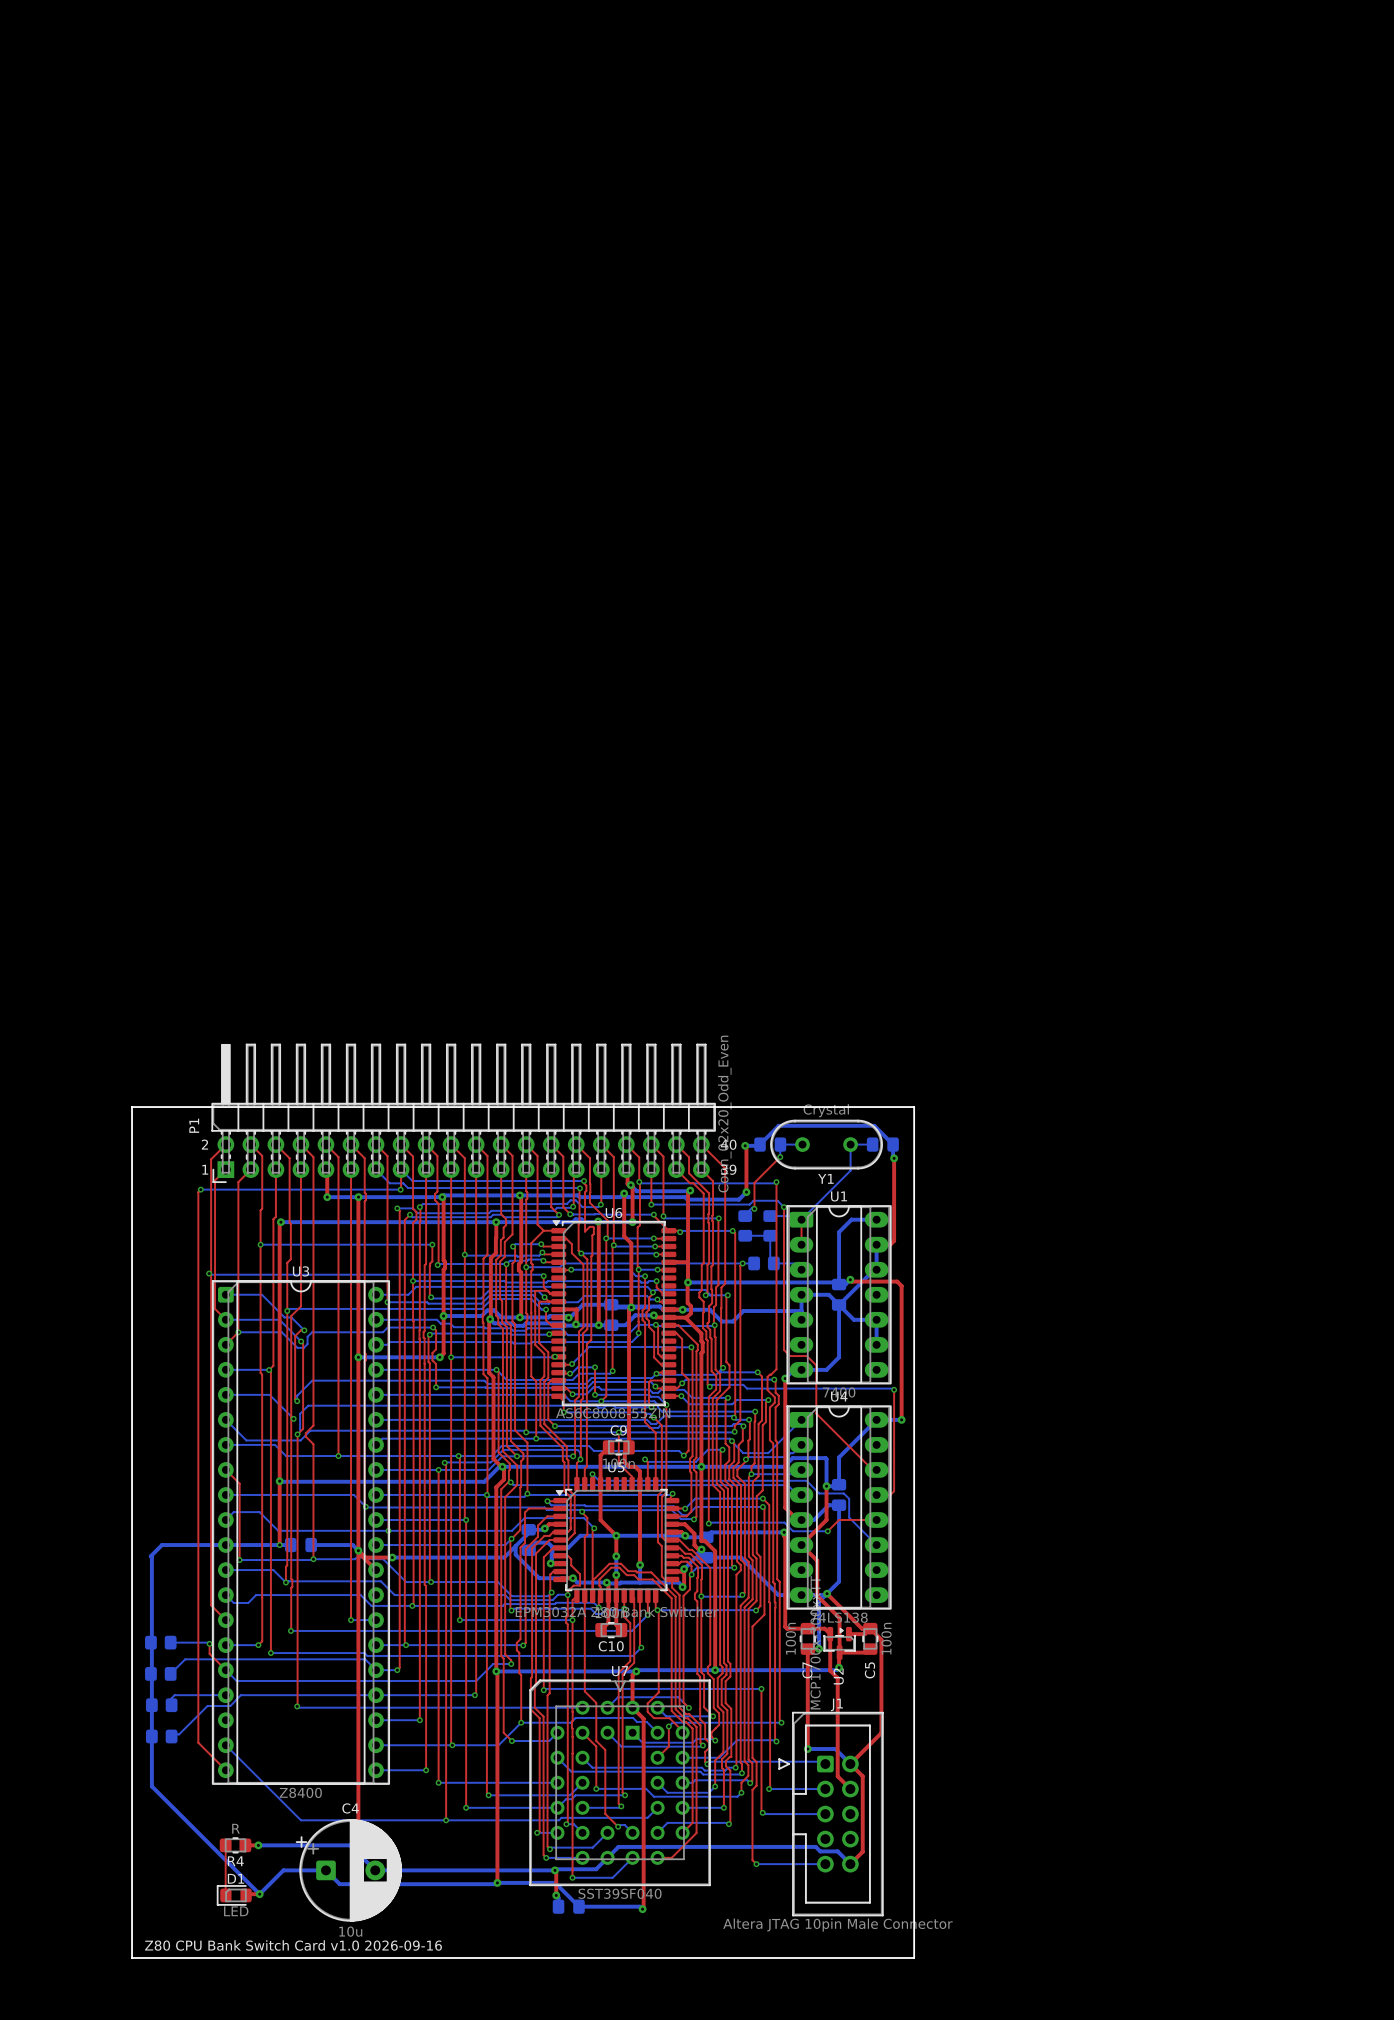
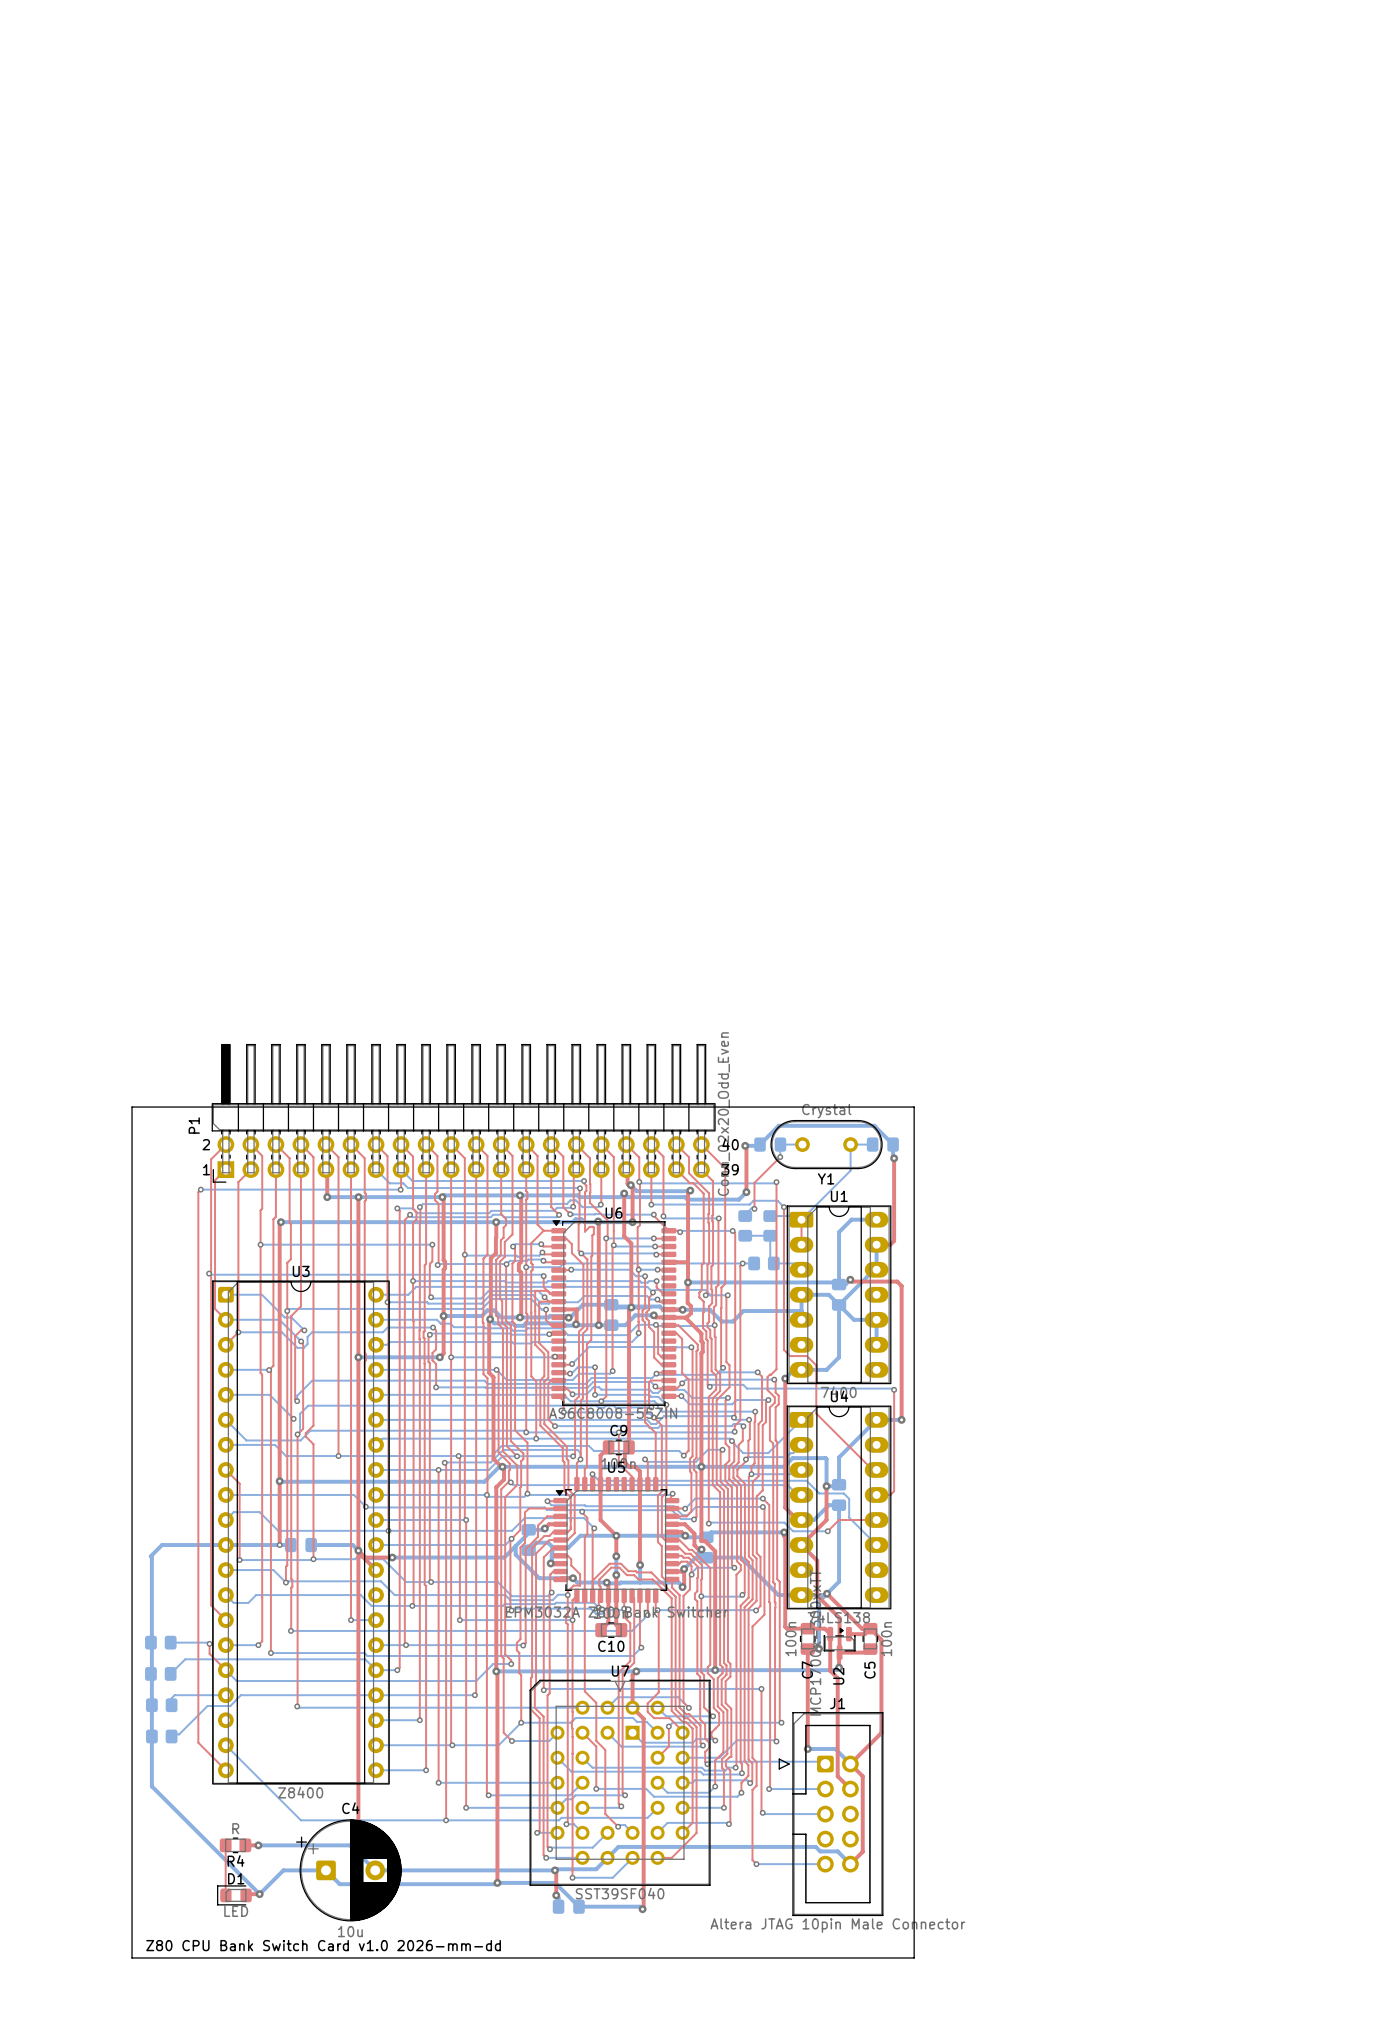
text: Z80 CPU Bank Switch Card v1.0 2026-09-16 (293, 1945) -> Z80 CPU Bank Switch Card v1.0 2026-mm-dd (323, 1945)

